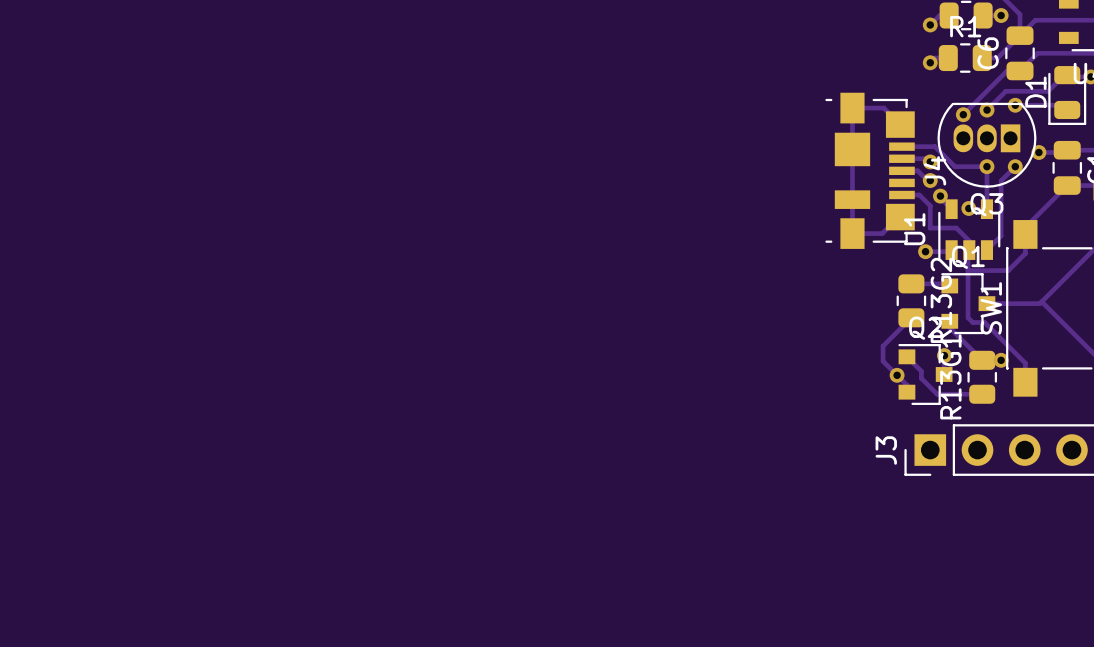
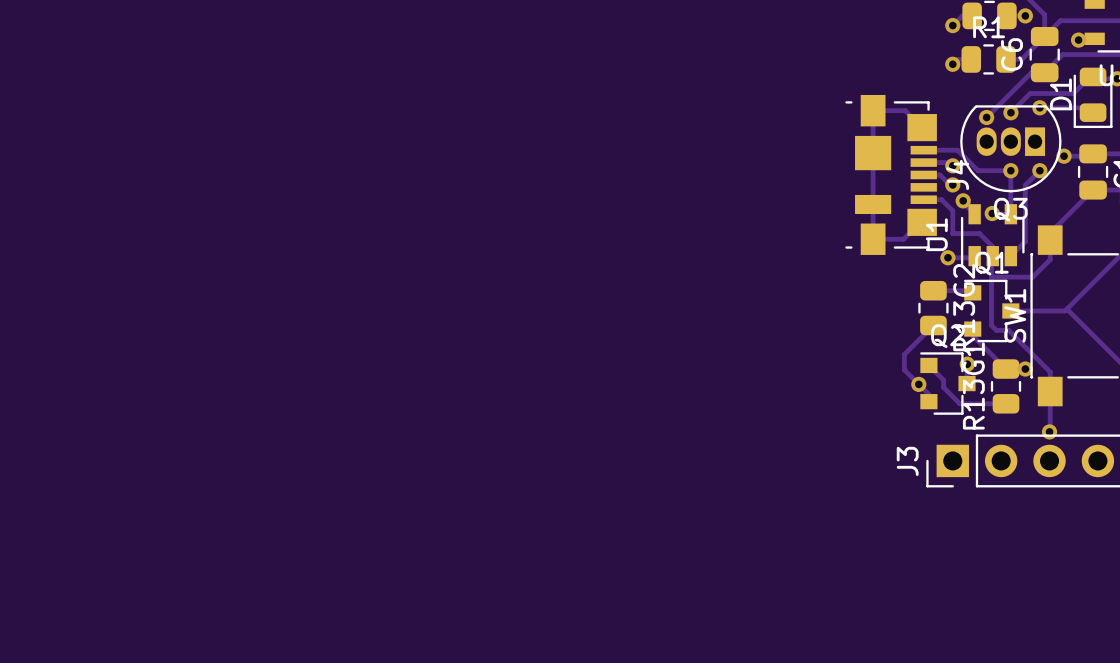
via: none -> (1078, 40)
track: none -> (1050, 391) (1049, 431)
via: none -> (1049, 431)

